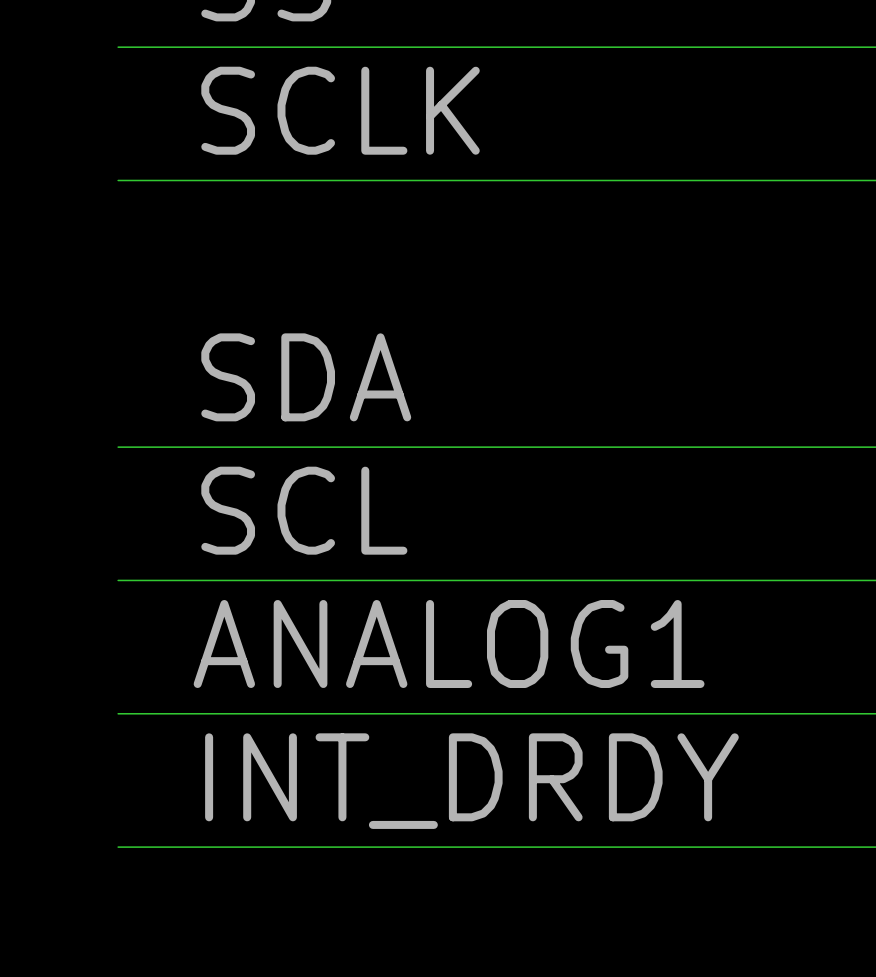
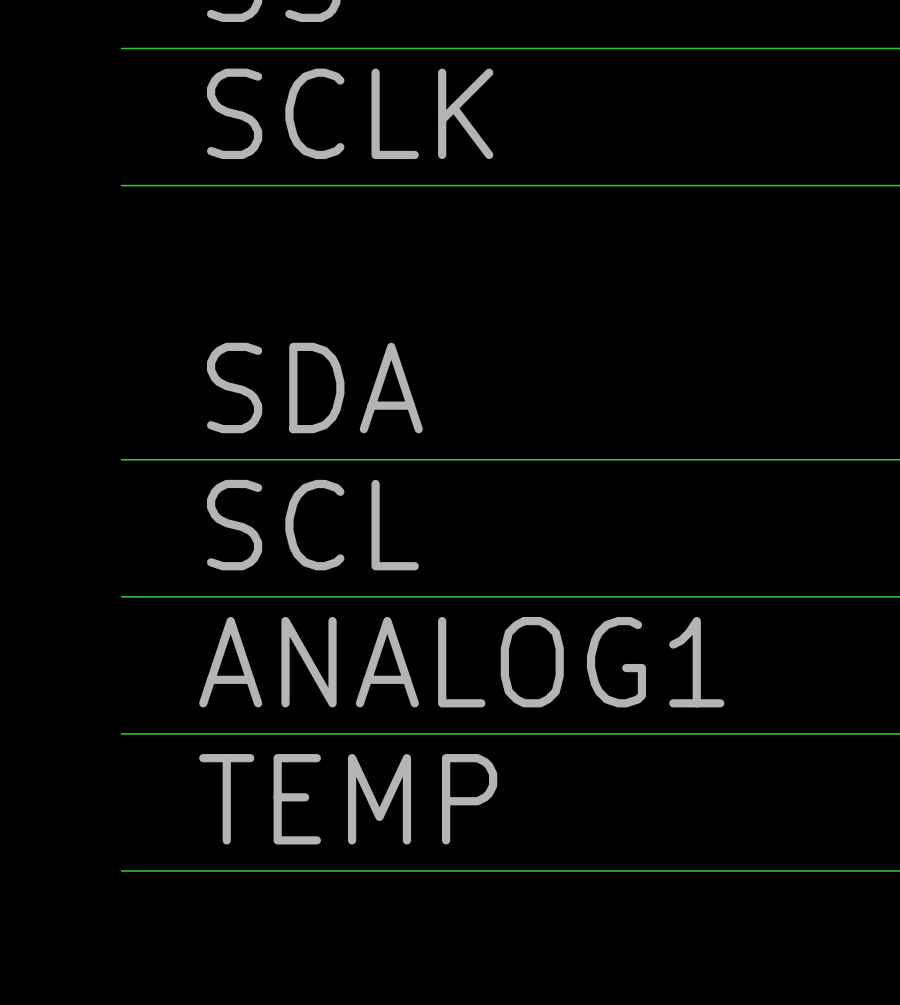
label: INT_DRDY (471, 781) -> TEMP (348, 799)

